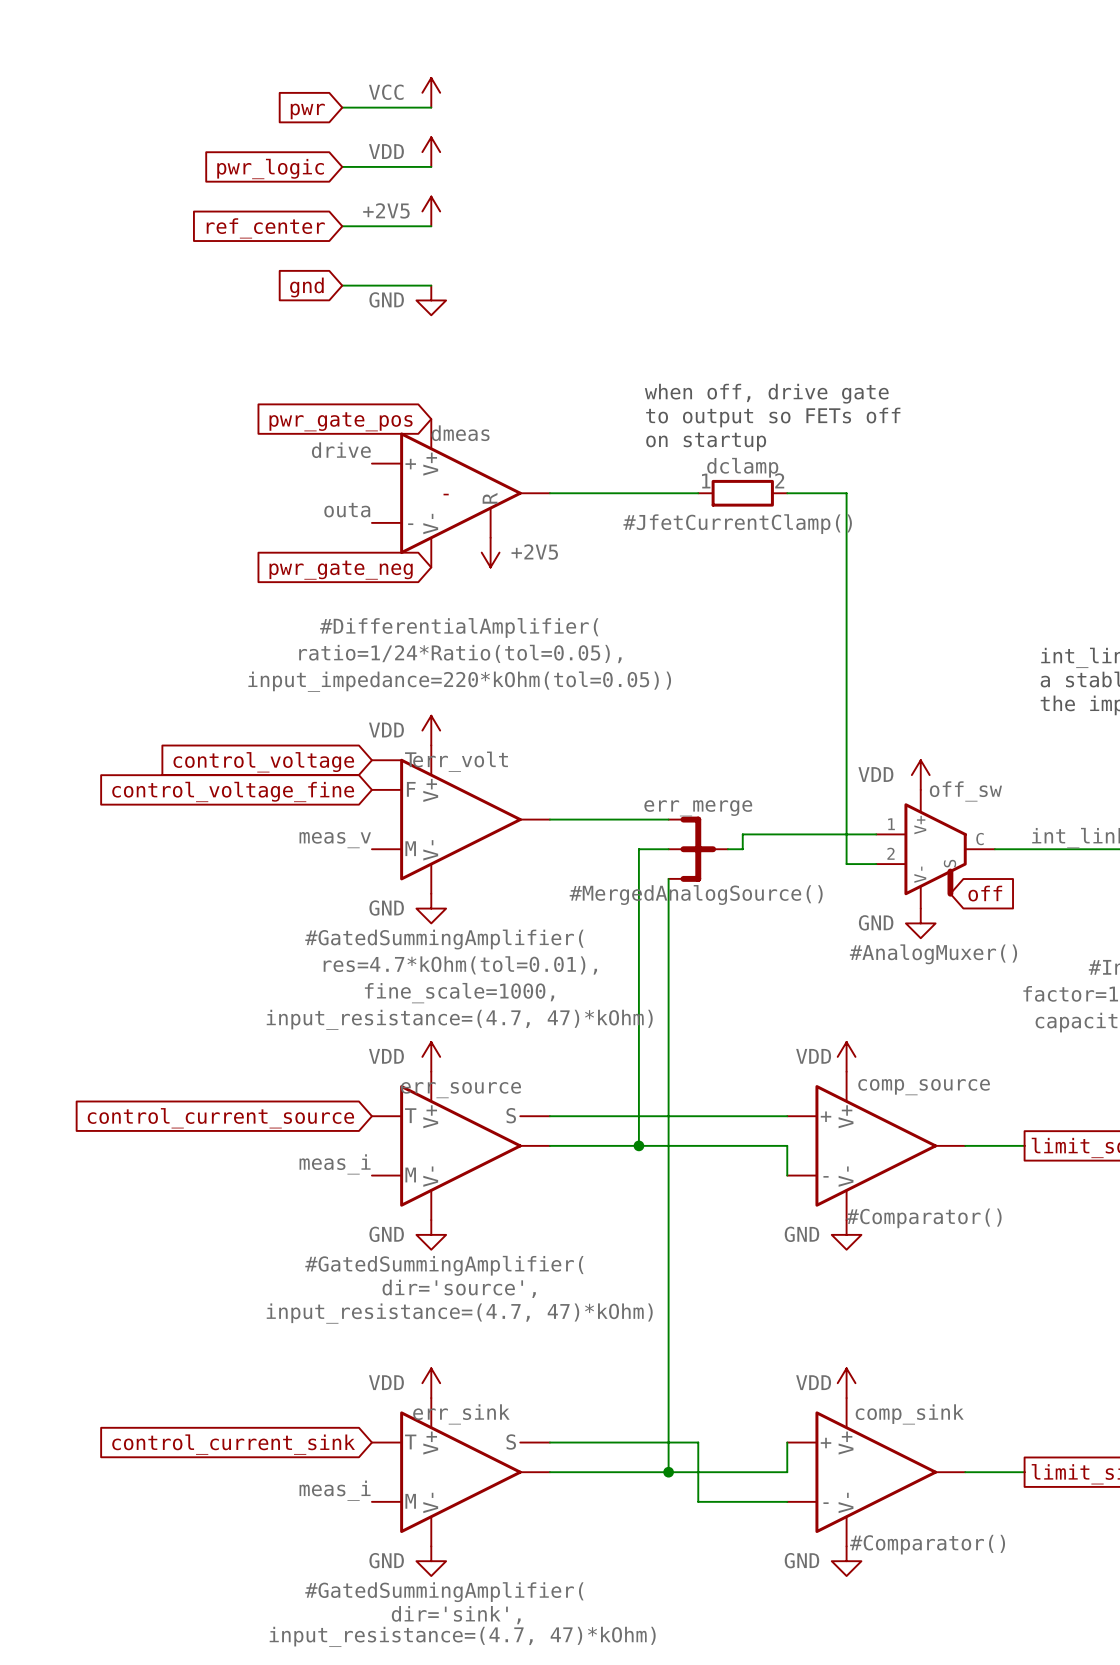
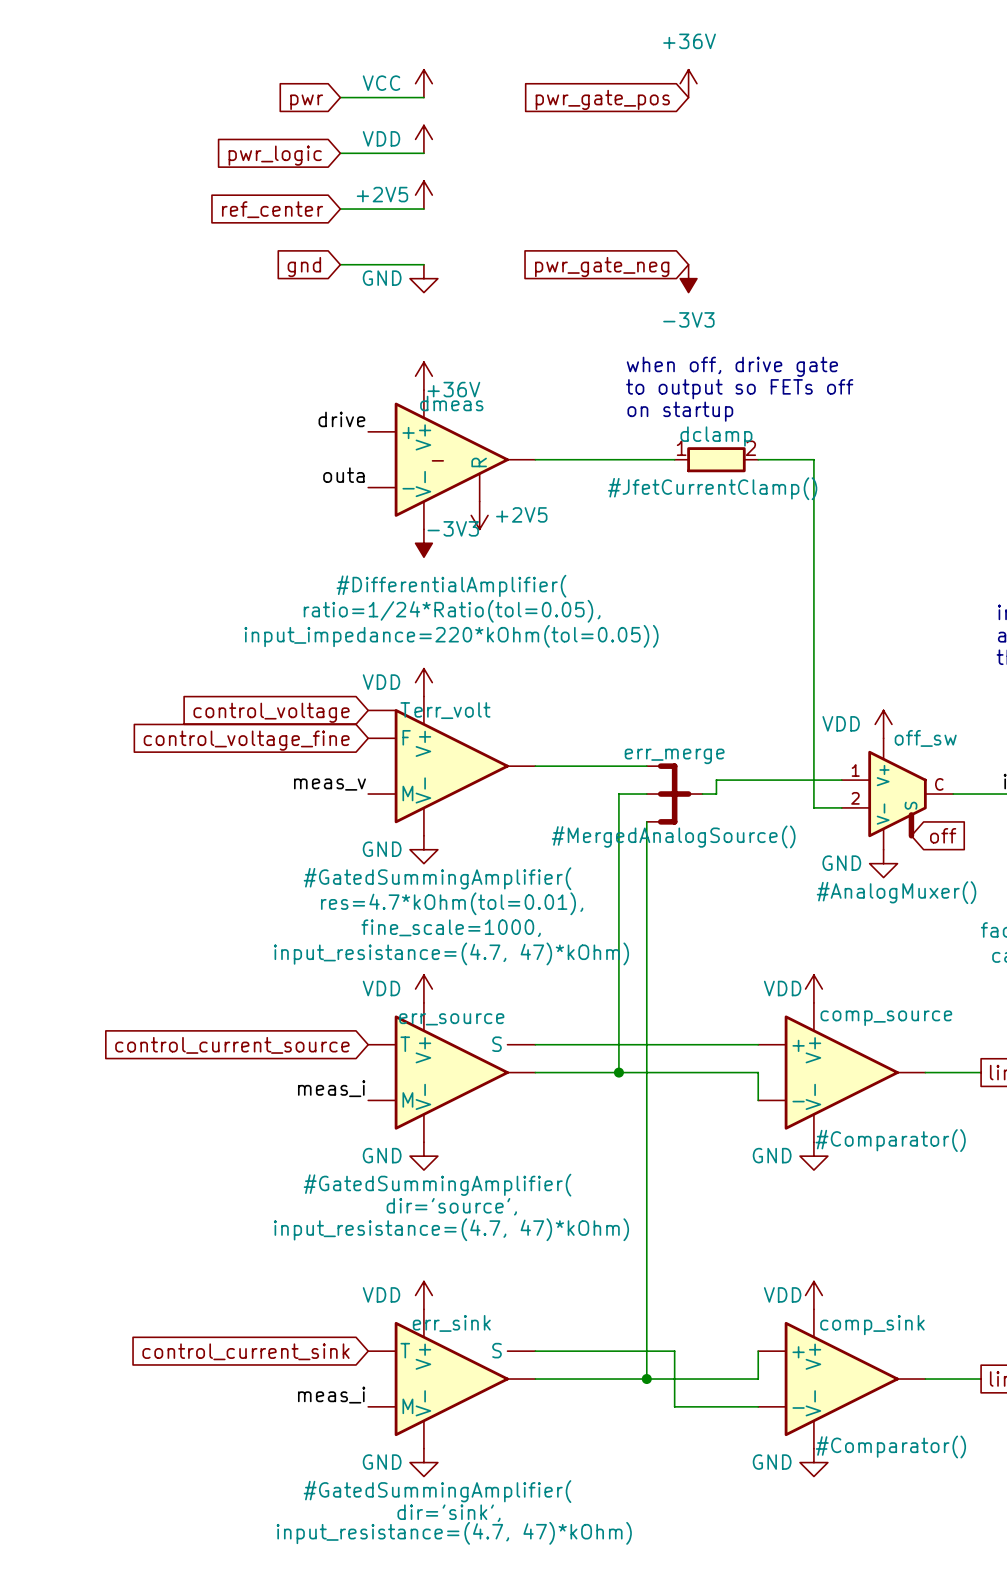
power symbol: none -> +36V (688, 83)
global label: none -> pwr_gate_pos (602, 99)
global label: none -> pwr_gate_neg (602, 267)
power symbol: none -> -3V3 (688, 278)
power symbol: none -> +36V (423, 376)
global label: pwr_gate_pos (341, 421) -> none
global label: pwr_gate_neg (341, 570) -> none
power symbol: none -> -3V3 (423, 543)

